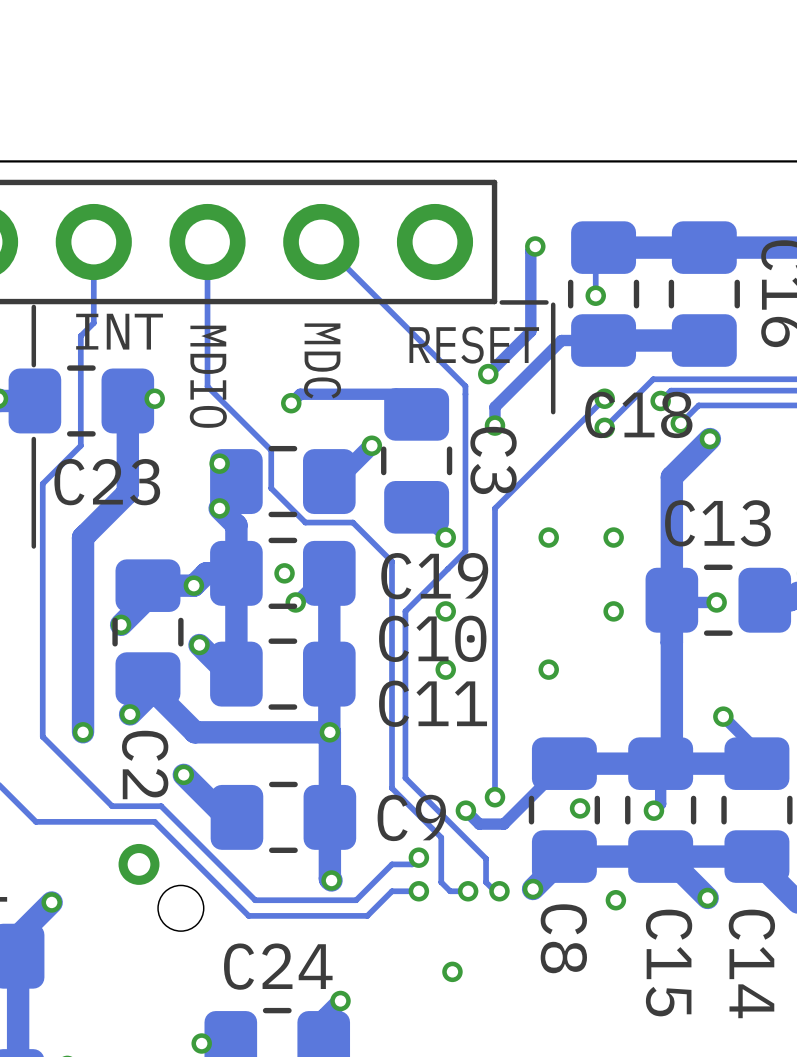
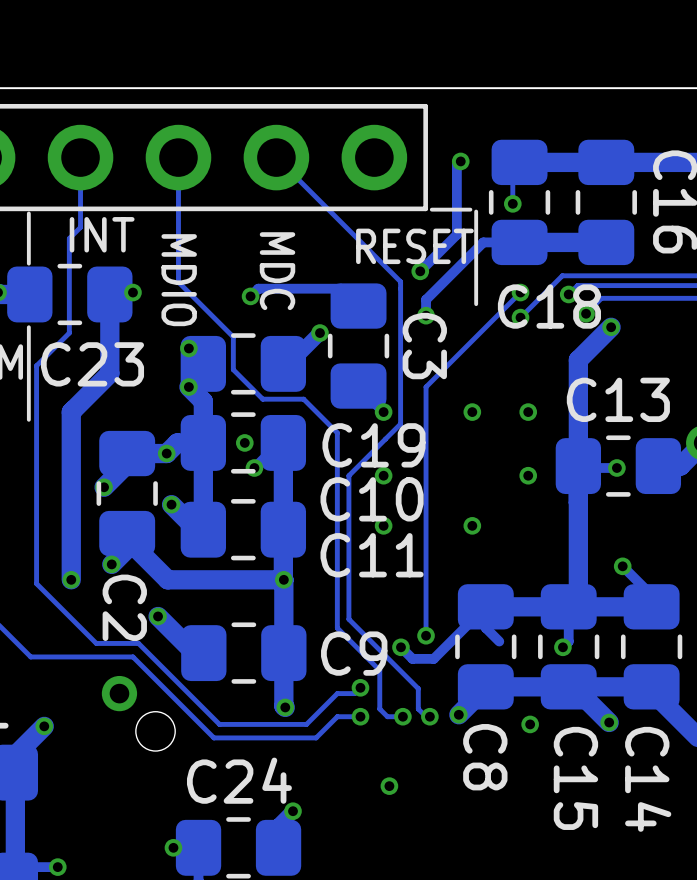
track: none -> (485, 606) (485, 628) (499, 641)
via: (580, 808) -> none

